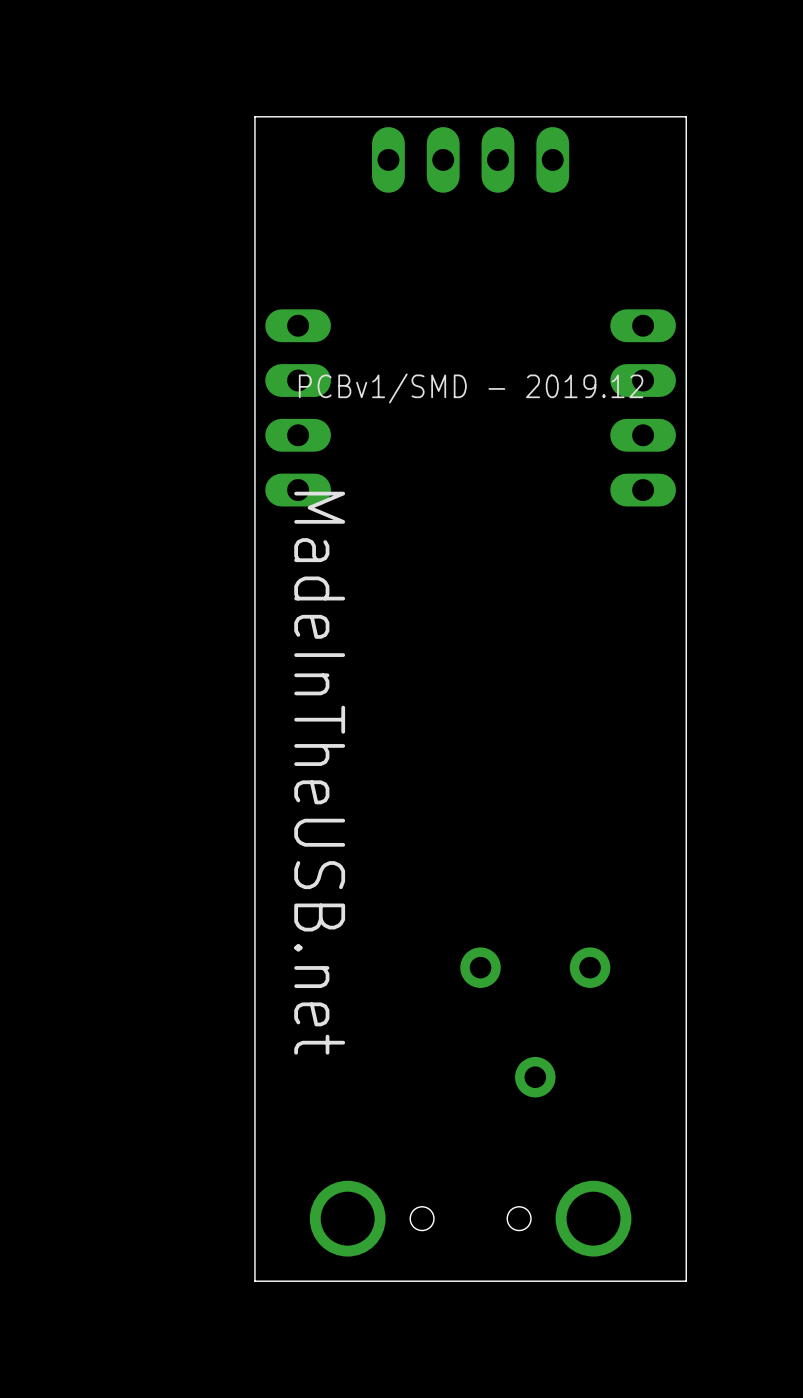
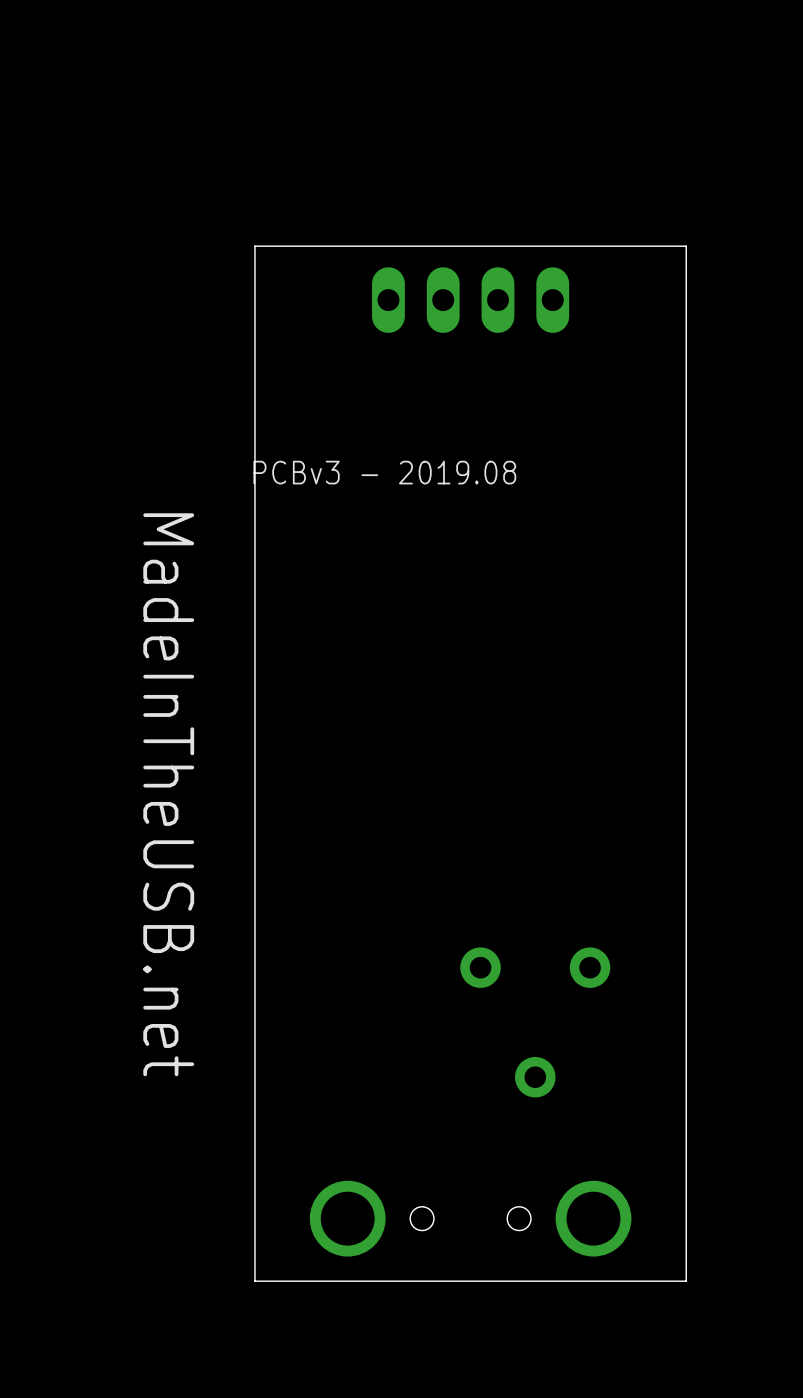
part: (470, 159) -> none
board edge: (686, 246) (686, 116) (254, 116) (254, 246) -> (686, 246) (254, 246)
part: none -> (470, 300)
text: PCBv1/SMD - 2019.12 (471, 388) -> none
part: (298, 407) -> none
part: (643, 407) -> none
text: none -> PCBv3 - 2019.08 (384, 472)
text position: MadeInTheUSB.net (319, 773) -> MadeInTheUSB.net (168, 794)

